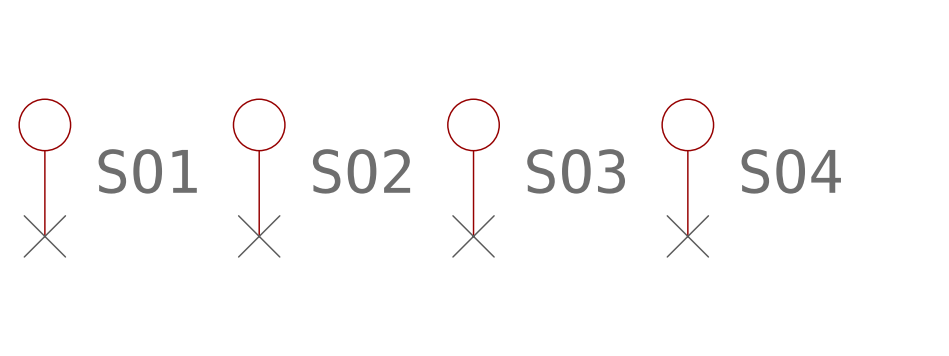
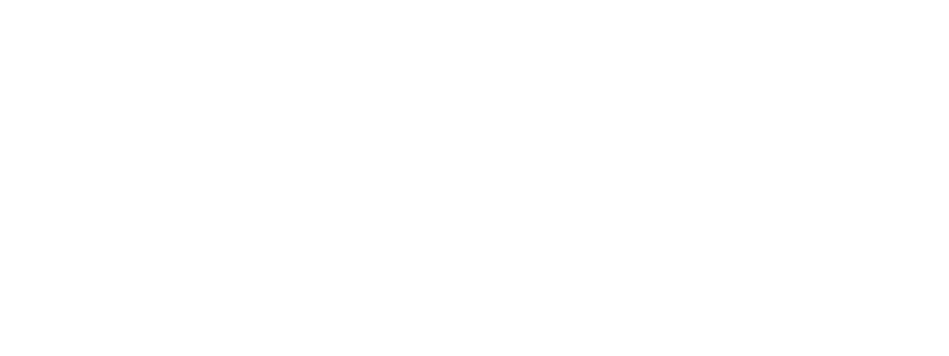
SO1: (44, 167) -> none
SO2: (259, 167) -> none
SO3: (473, 167) -> none
SO4: (687, 167) -> none
no-connect mark: (44, 236) -> none
no-connect mark: (259, 236) -> none
no-connect mark: (473, 236) -> none
no-connect mark: (687, 236) -> none

